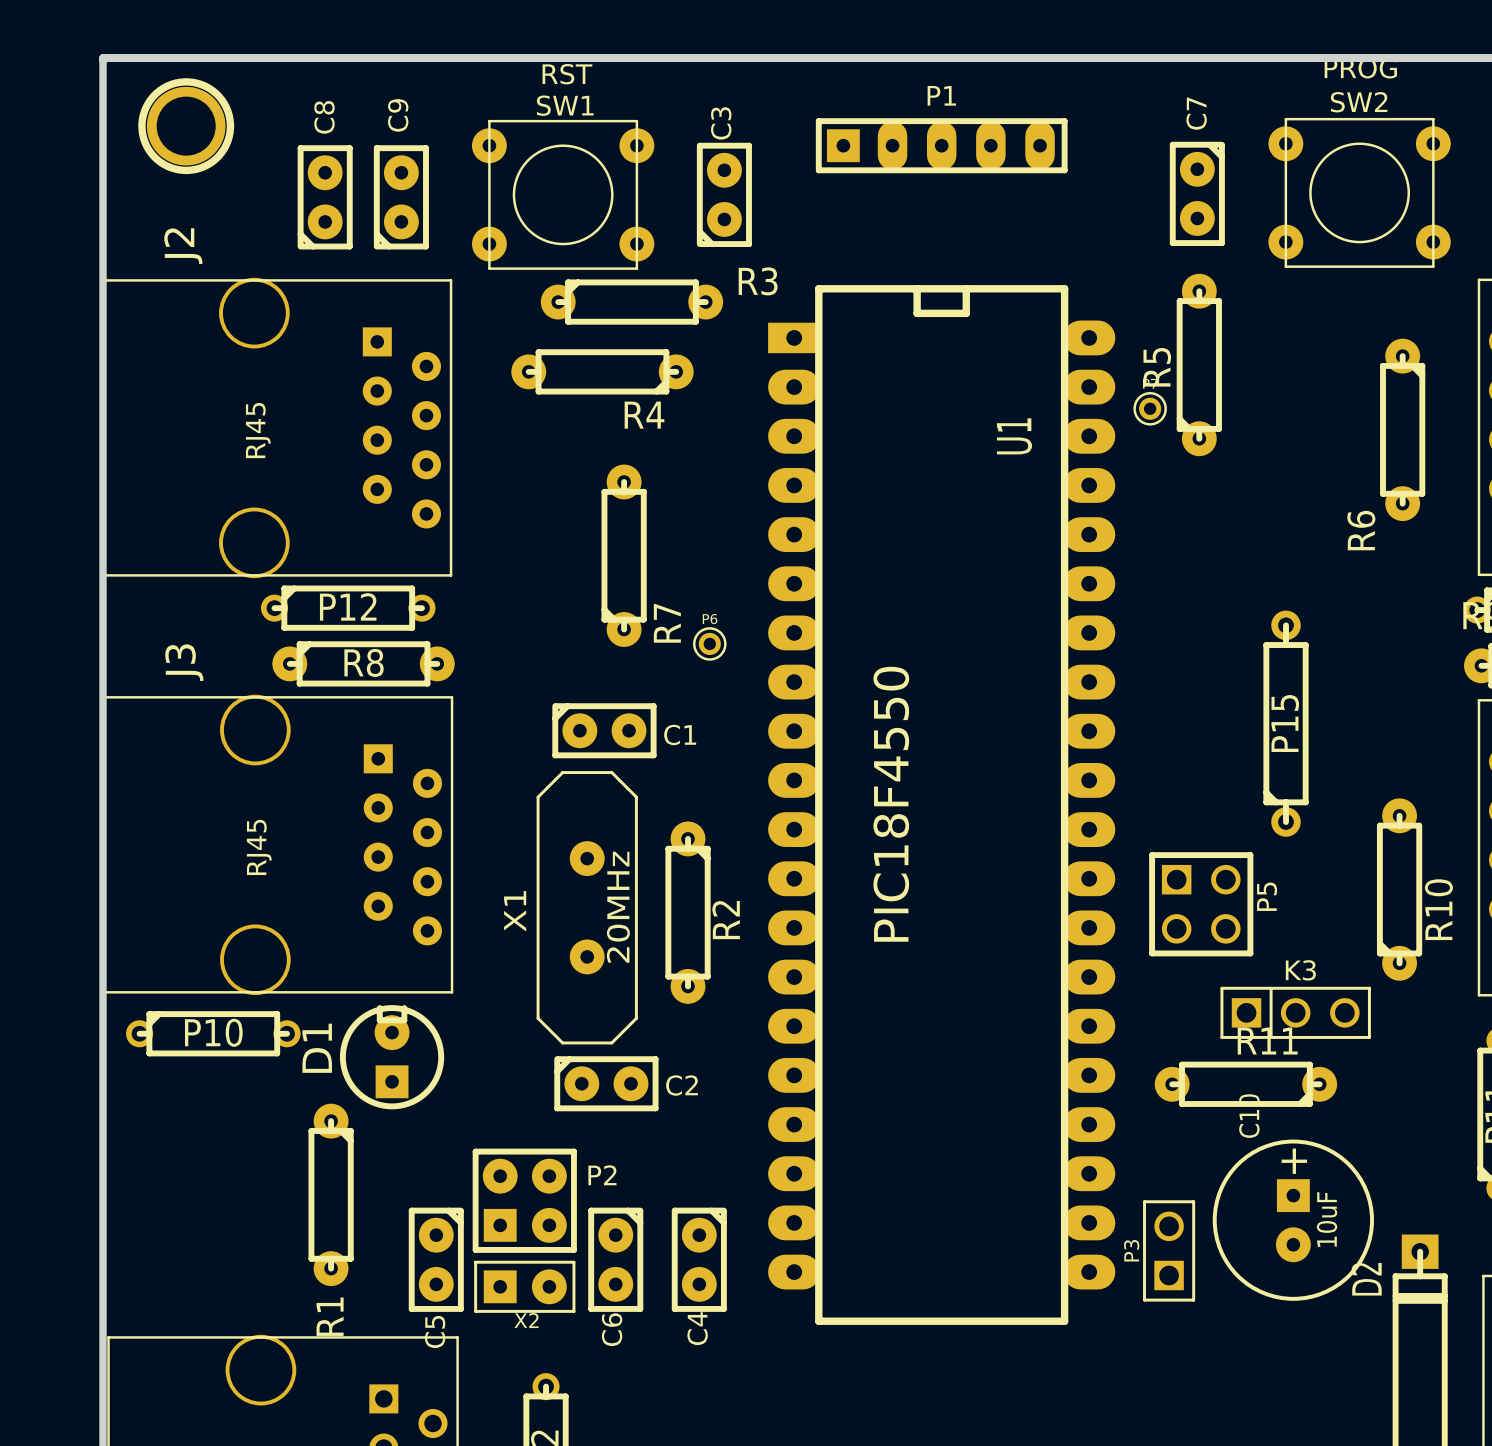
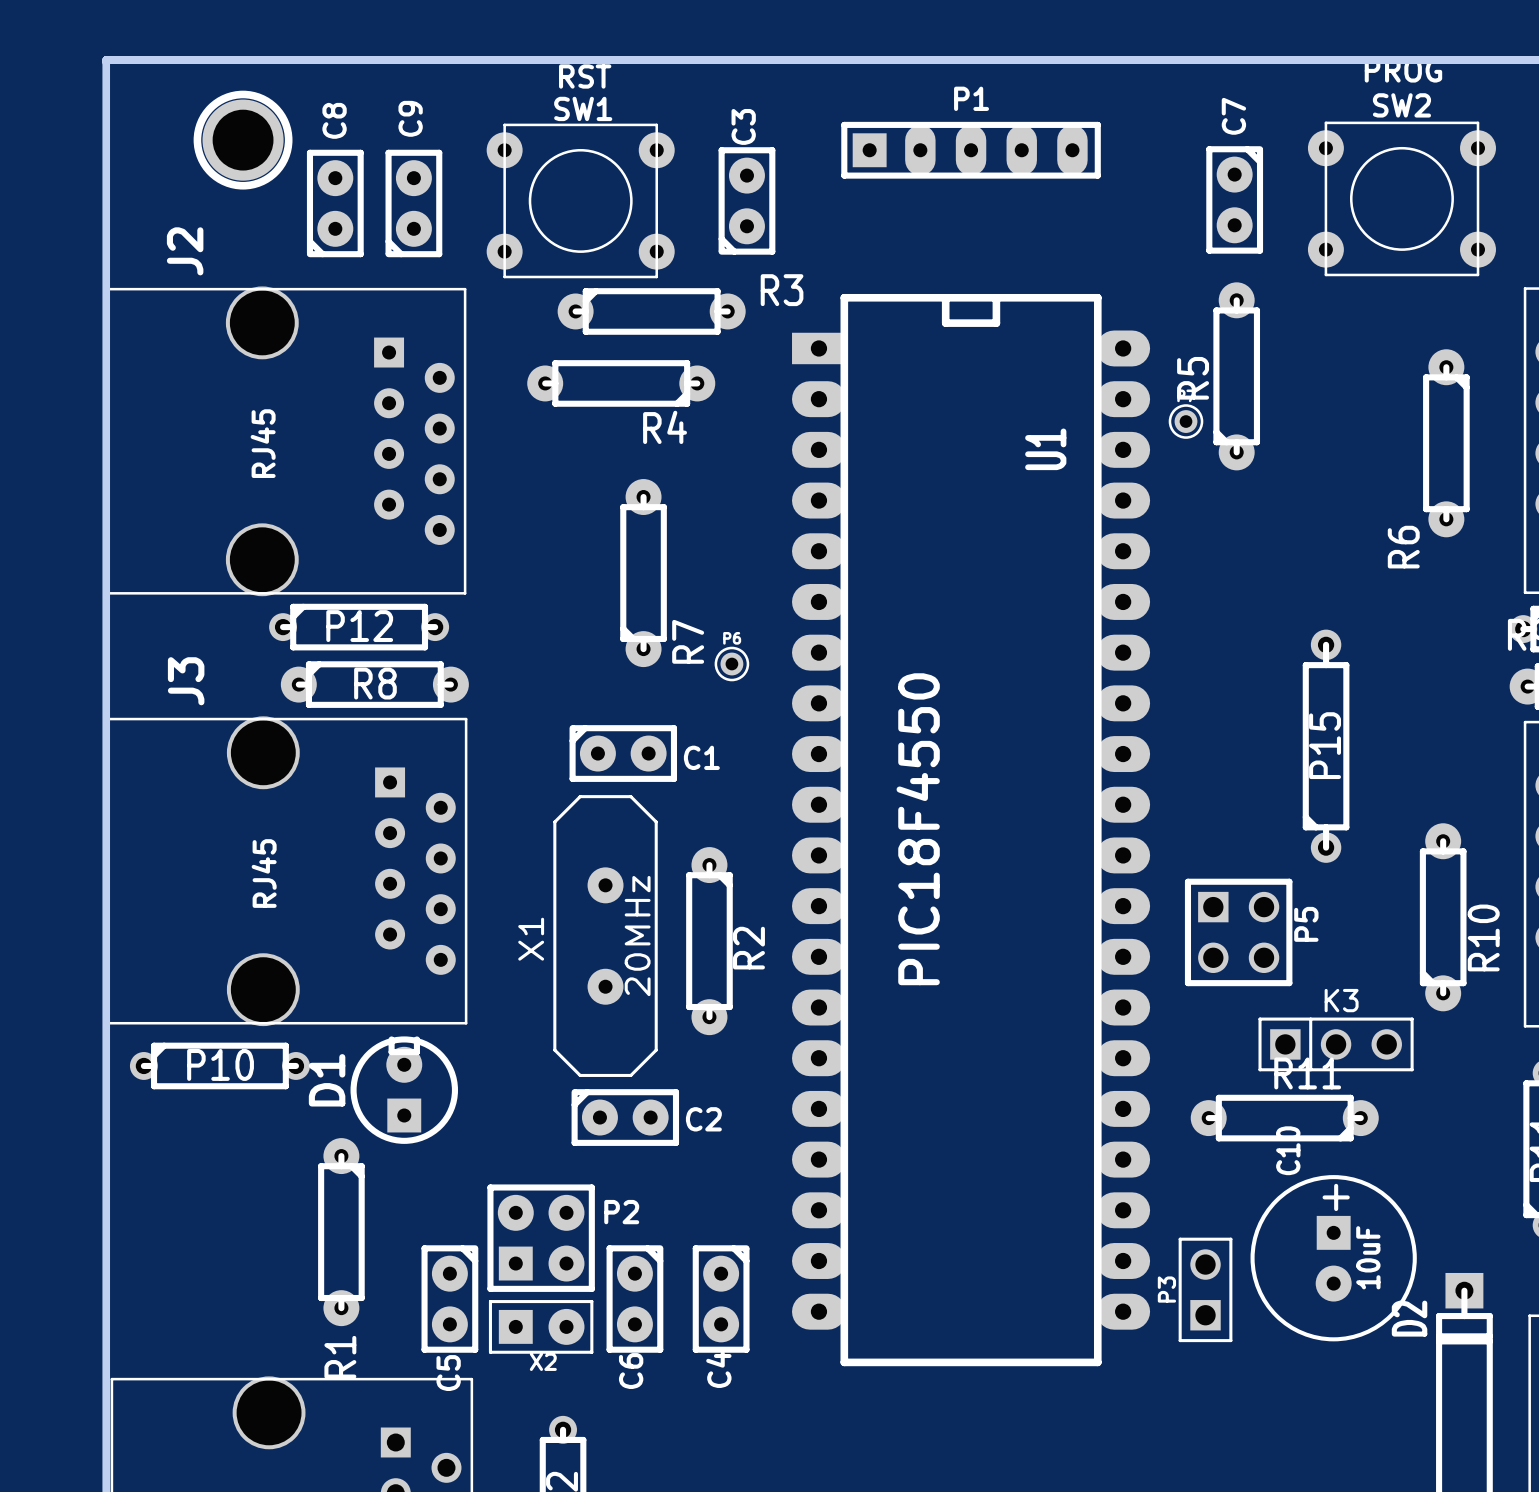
part position: (186, 126) -> (243, 140)

